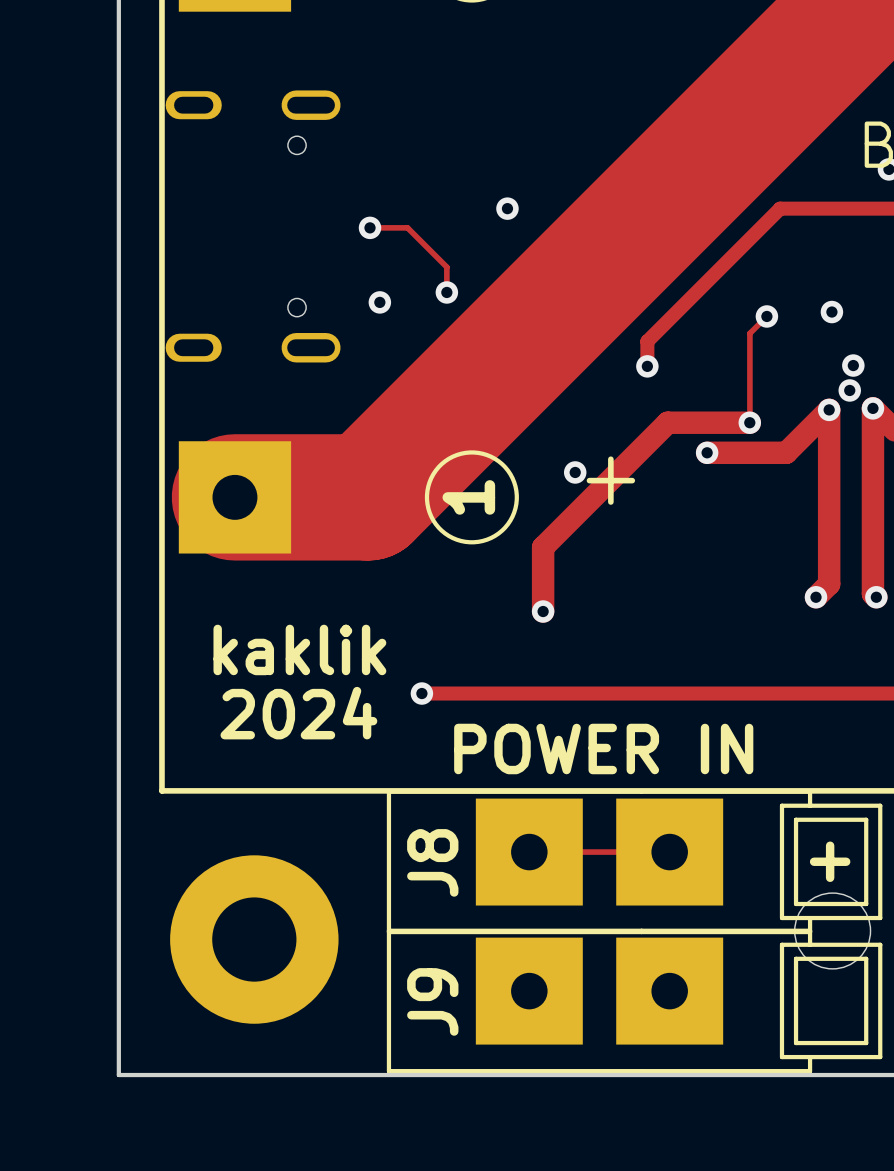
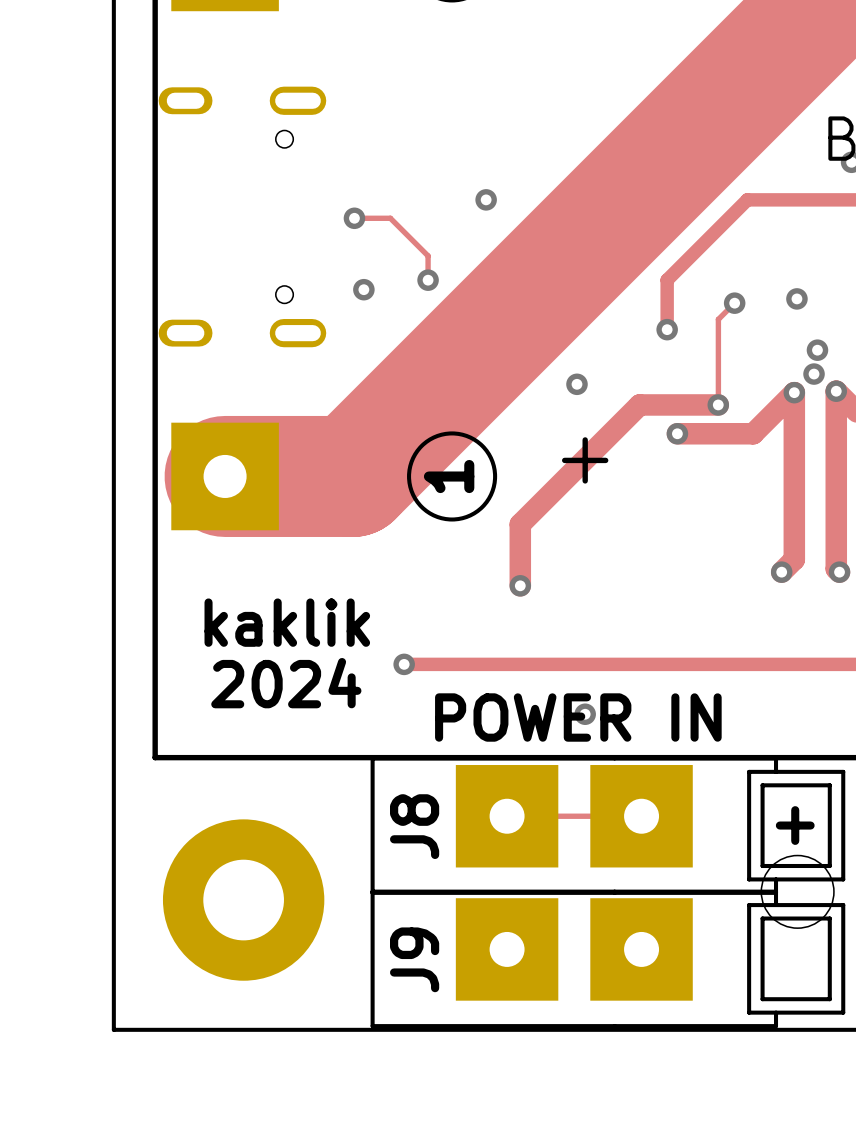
track: (696, 292) (647, 341) (647, 366) -> (667, 280) (667, 329)
via: none -> (667, 329)
via: (647, 366) -> none
via: none -> (576, 384)
via: (575, 472) -> none
via: none -> (585, 714)

